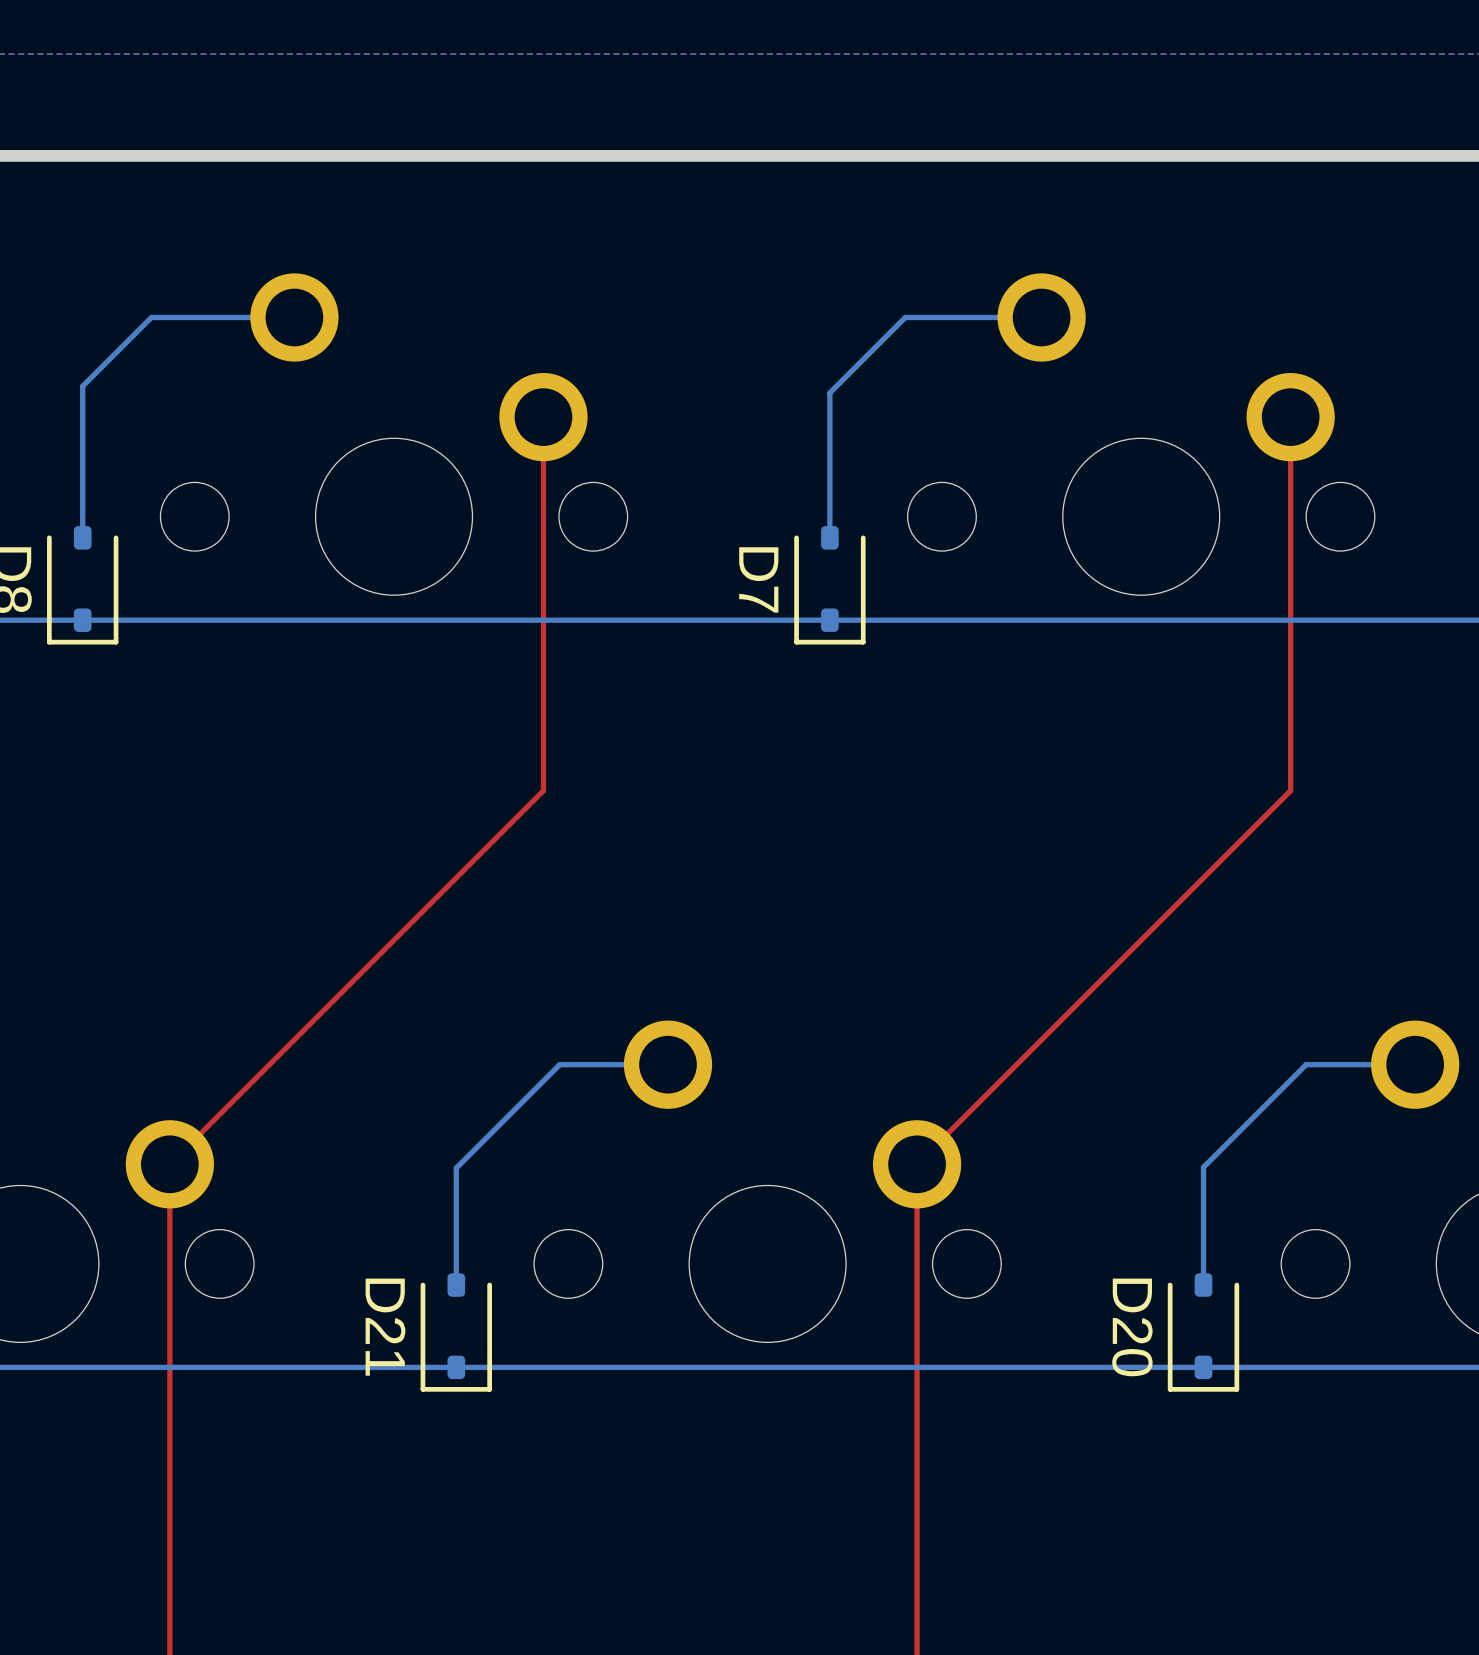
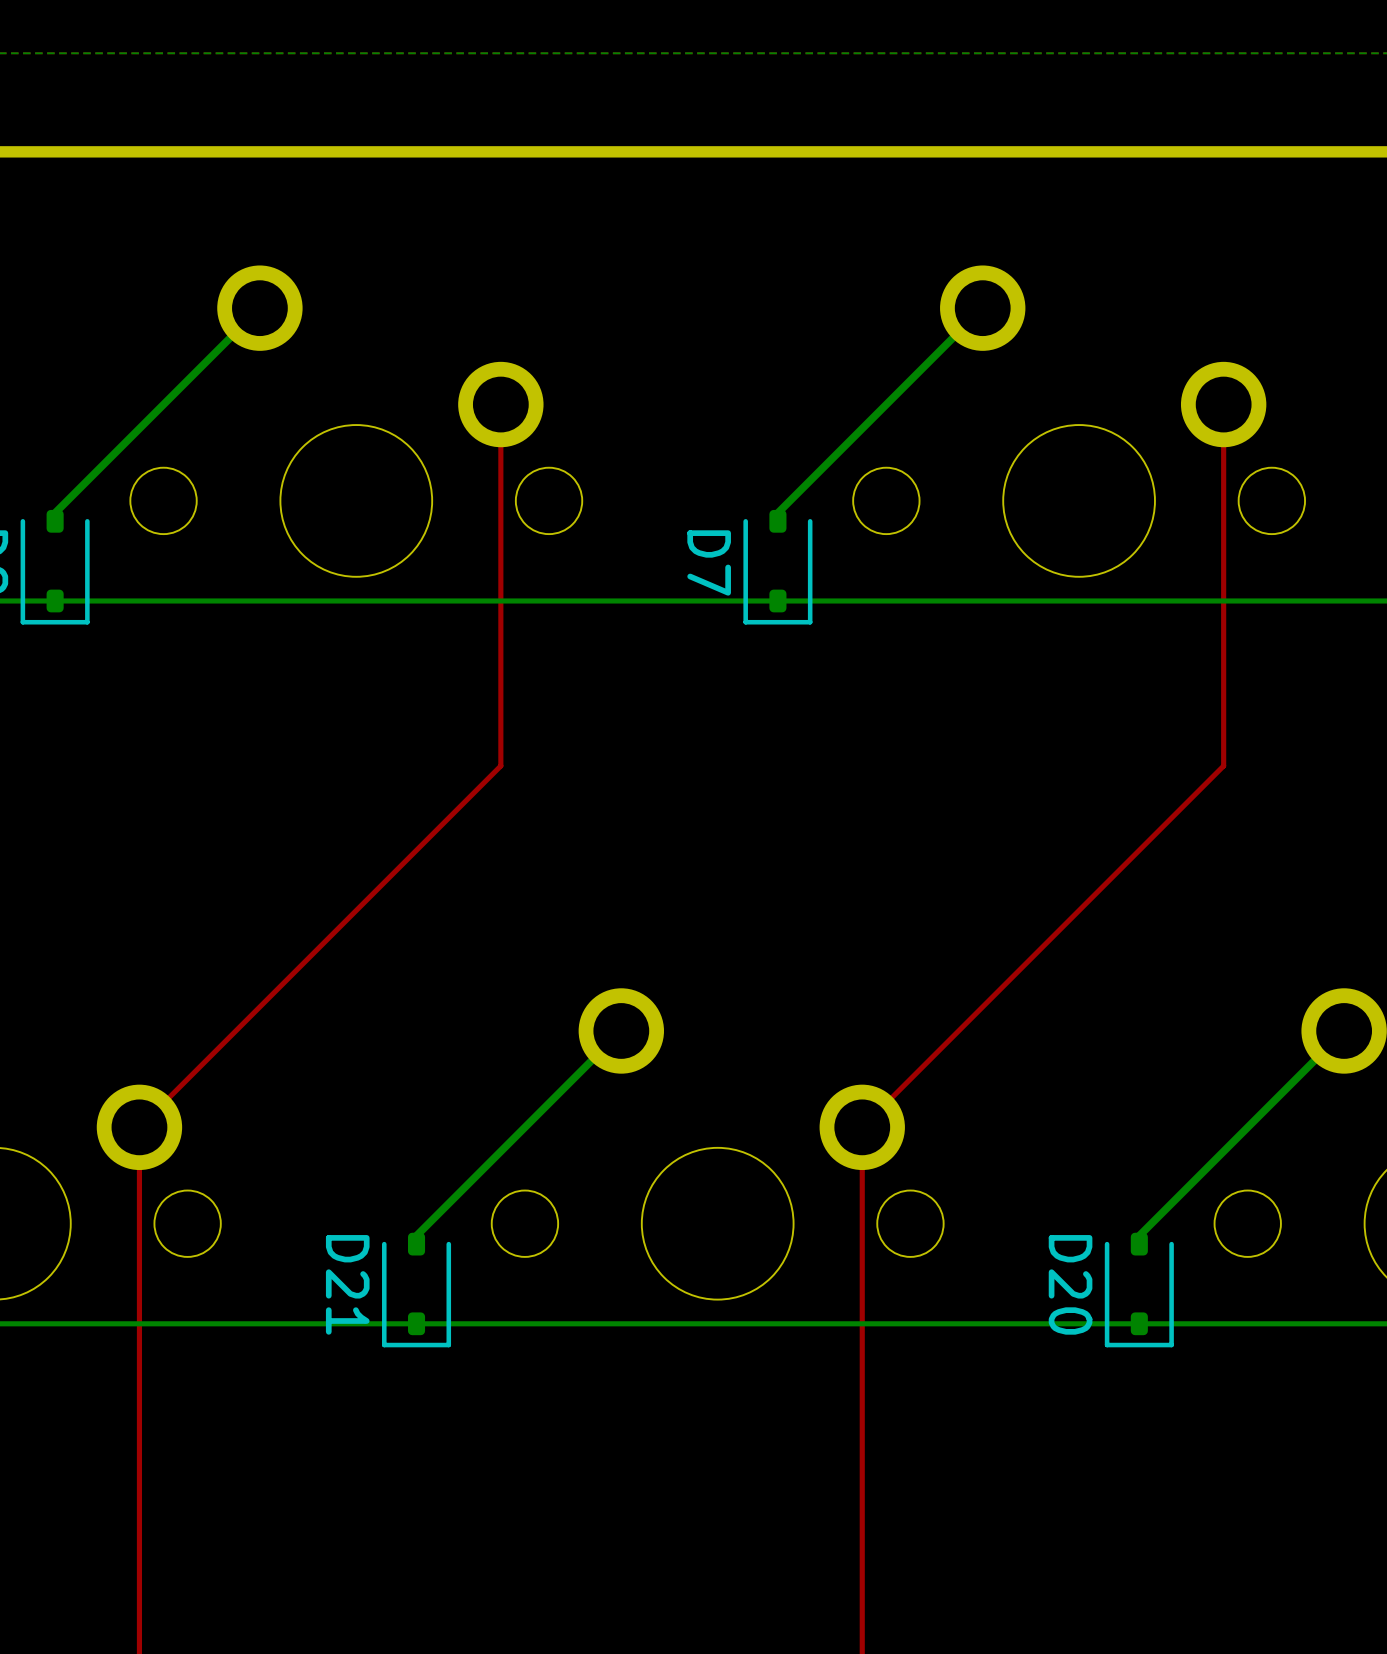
bottom track: (294, 317) (151, 317) (82, 386) (82, 529) -> (259, 308) (55, 512)
bottom track: (1041, 317) (905, 317) (829, 392) (829, 529) -> (982, 308) (777, 512)
bottom track: (668, 1064) (559, 1064) (456, 1168) (456, 1276) -> (621, 1030) (416, 1235)
bottom track: (1415, 1064) (1306, 1064) (1203, 1167) (1203, 1276) -> (1344, 1030) (1139, 1235)

